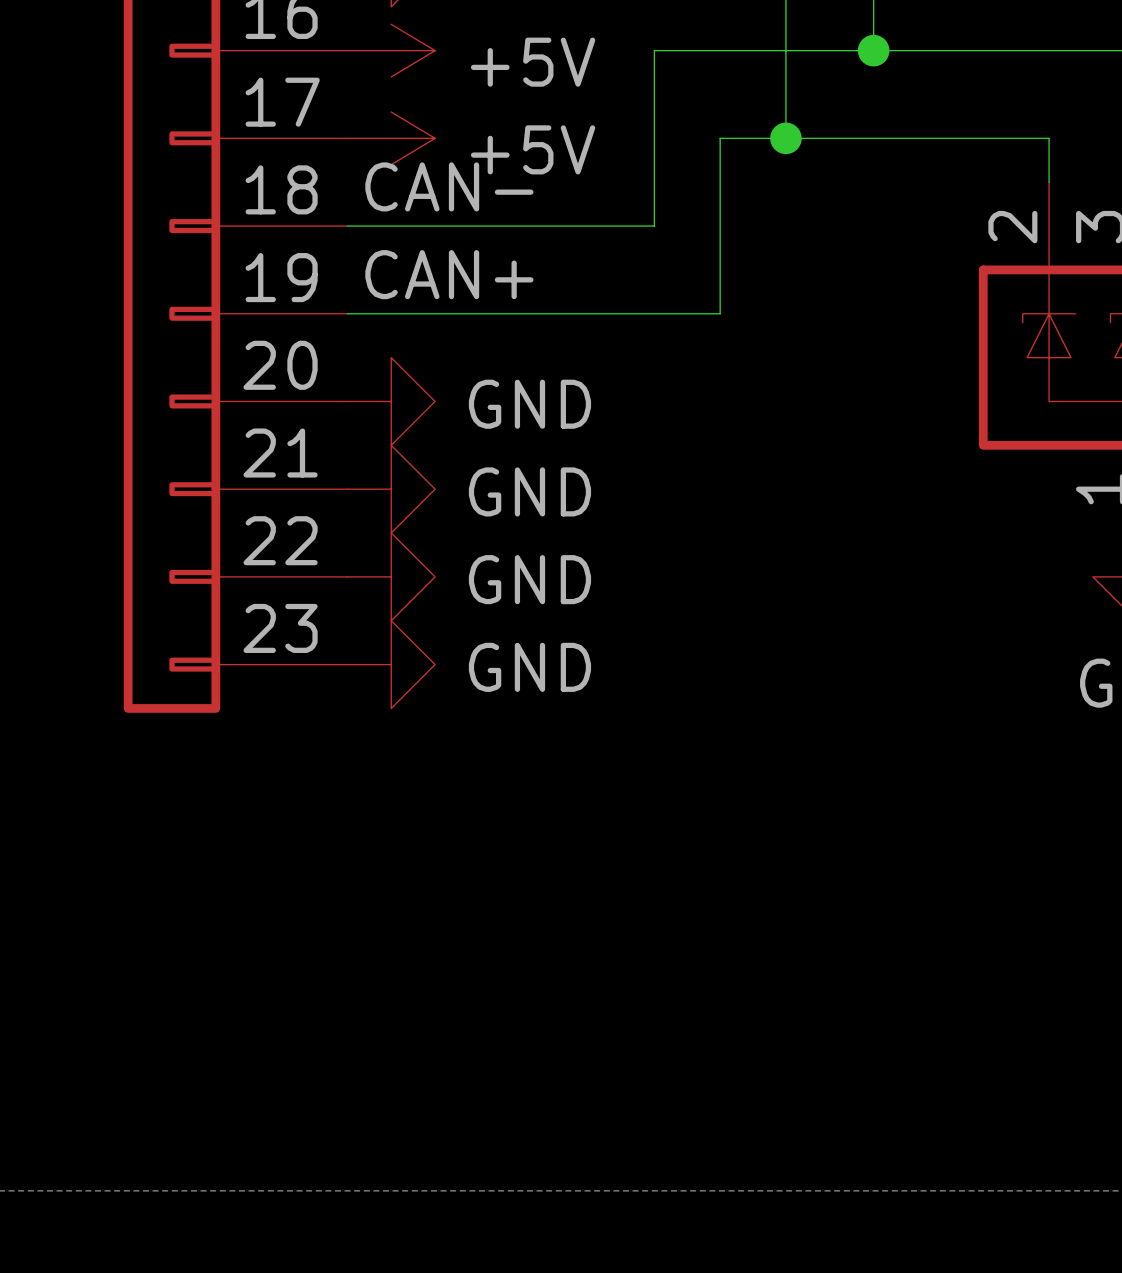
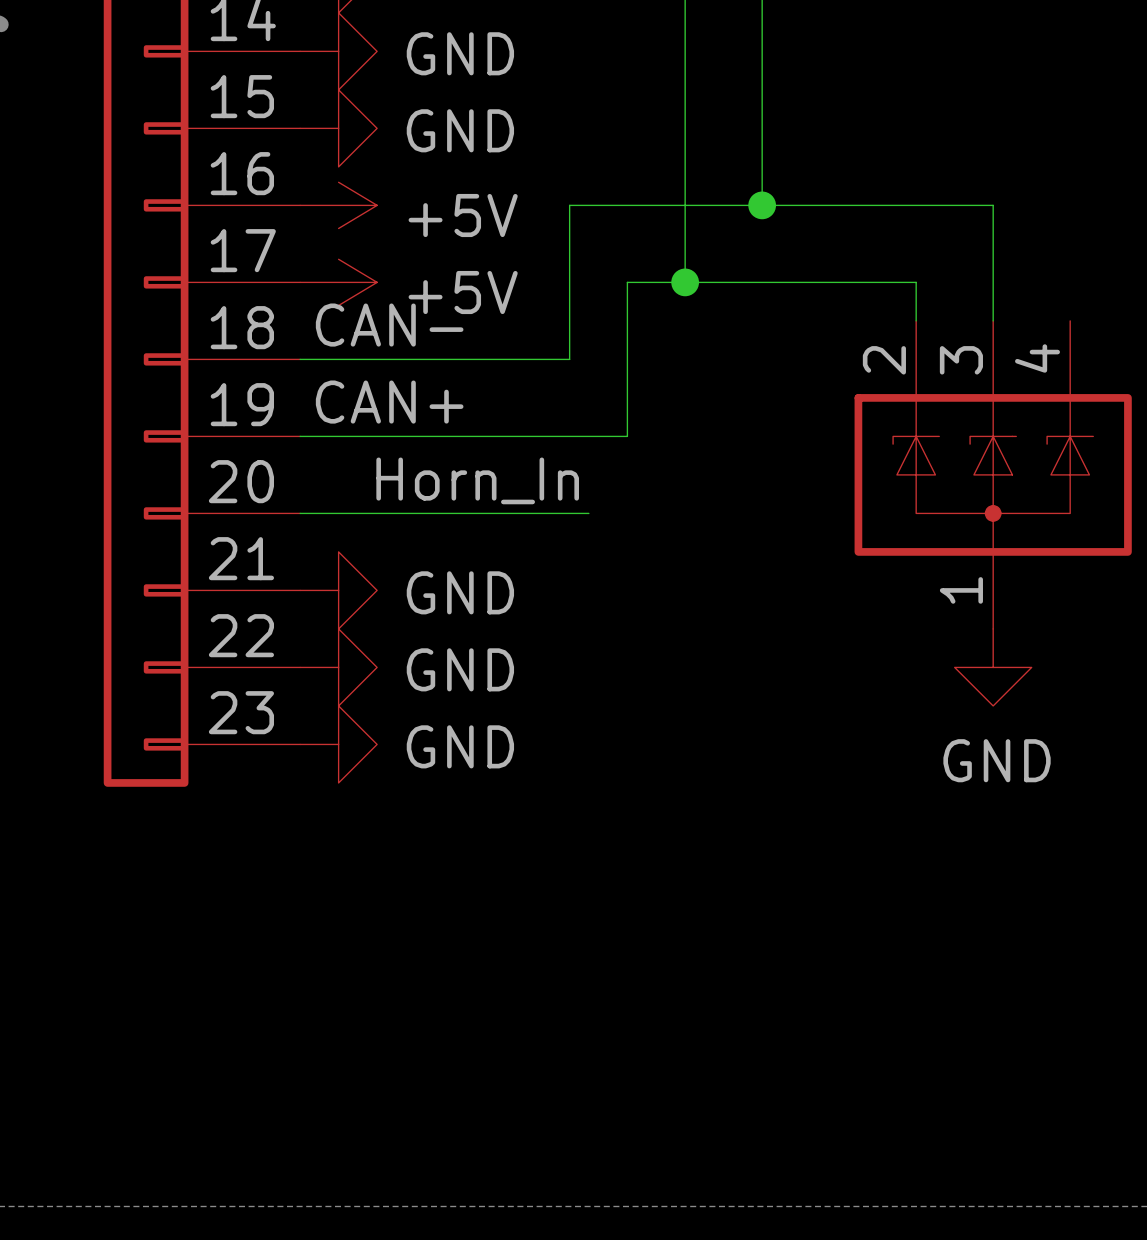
label: none -> Horn_In (477, 480)
wire: none -> (300, 513) (588, 513)
power symbol: GND (391, 401) -> none

